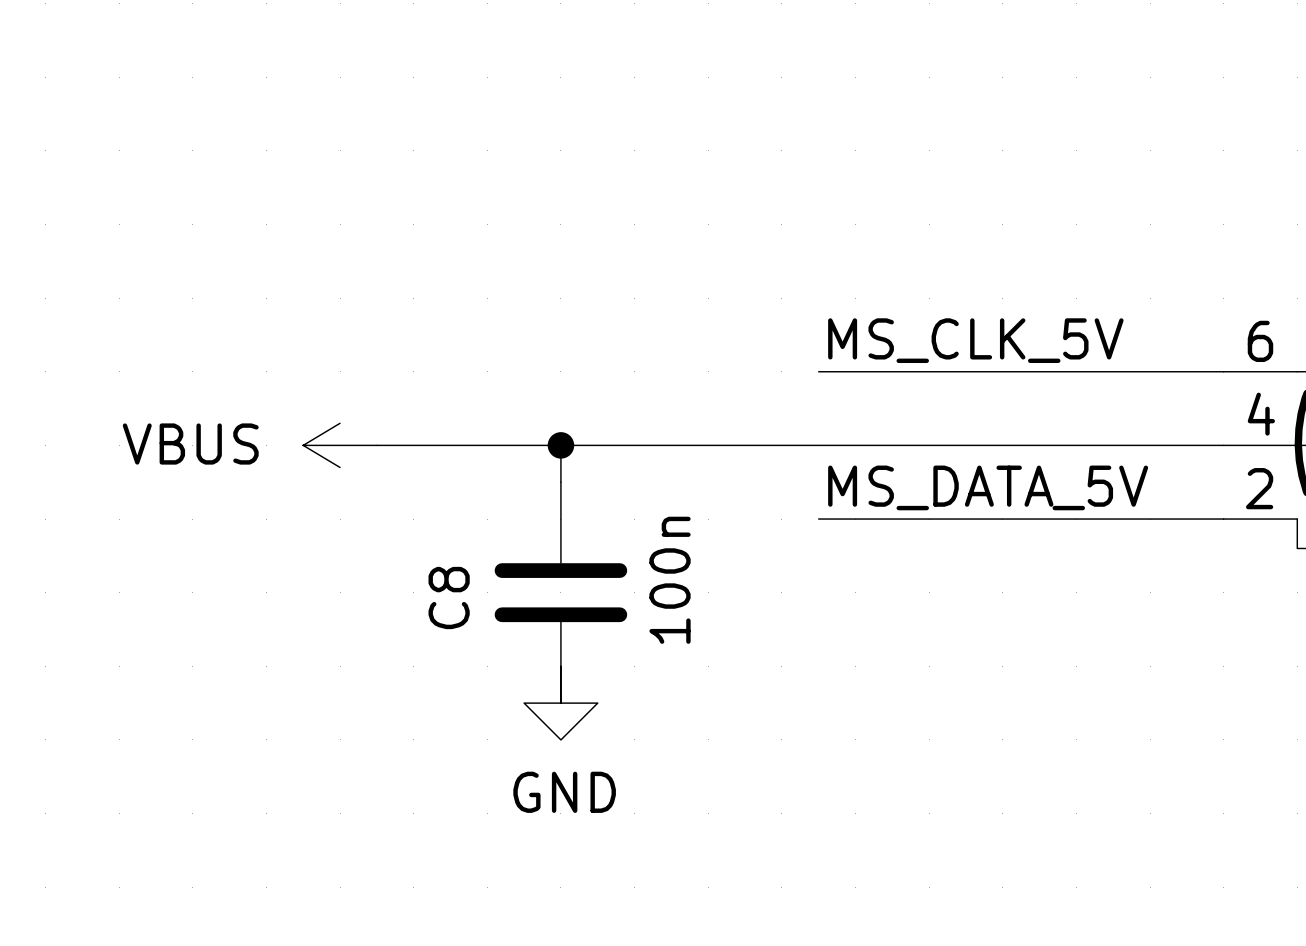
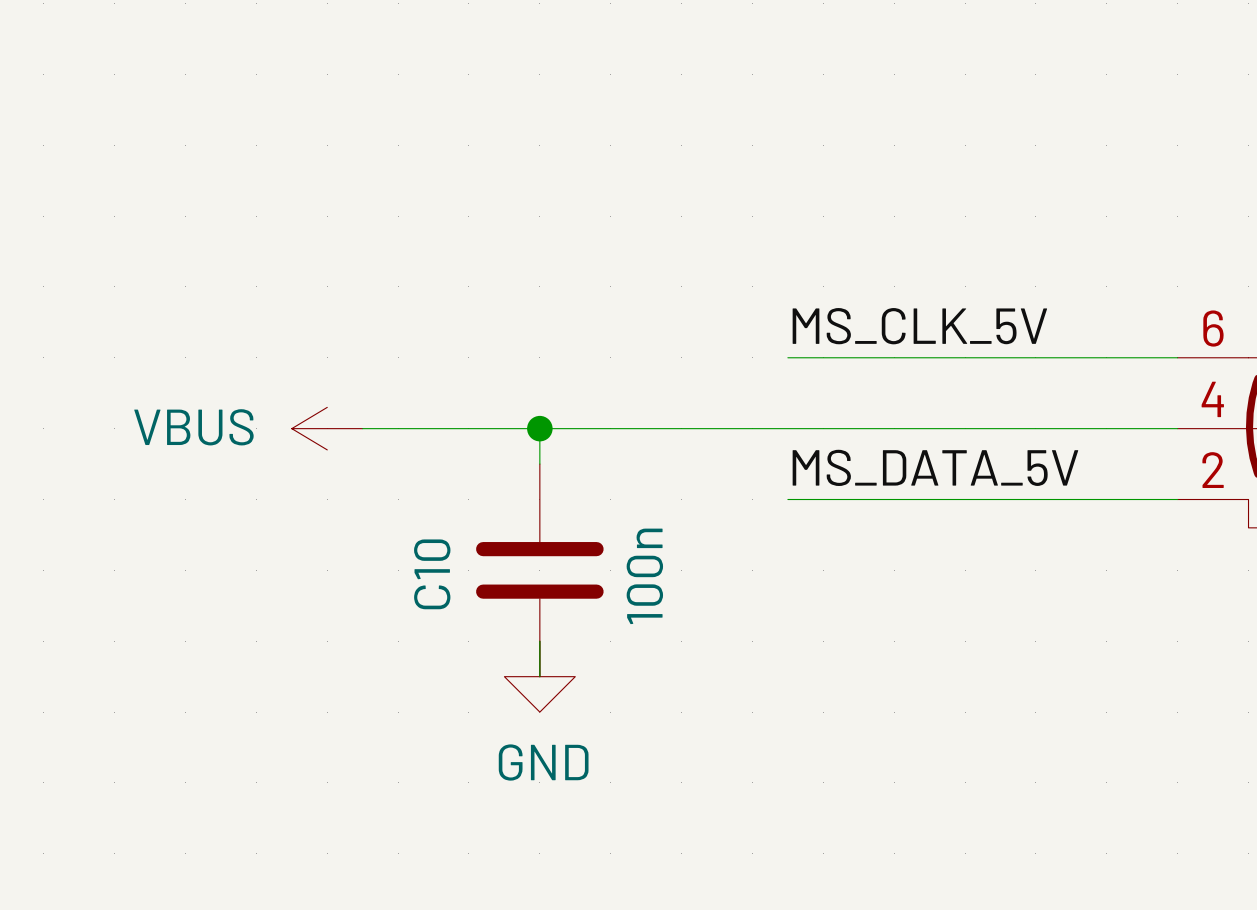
C8 name: C8 (449, 597) -> C10 (432, 574)

